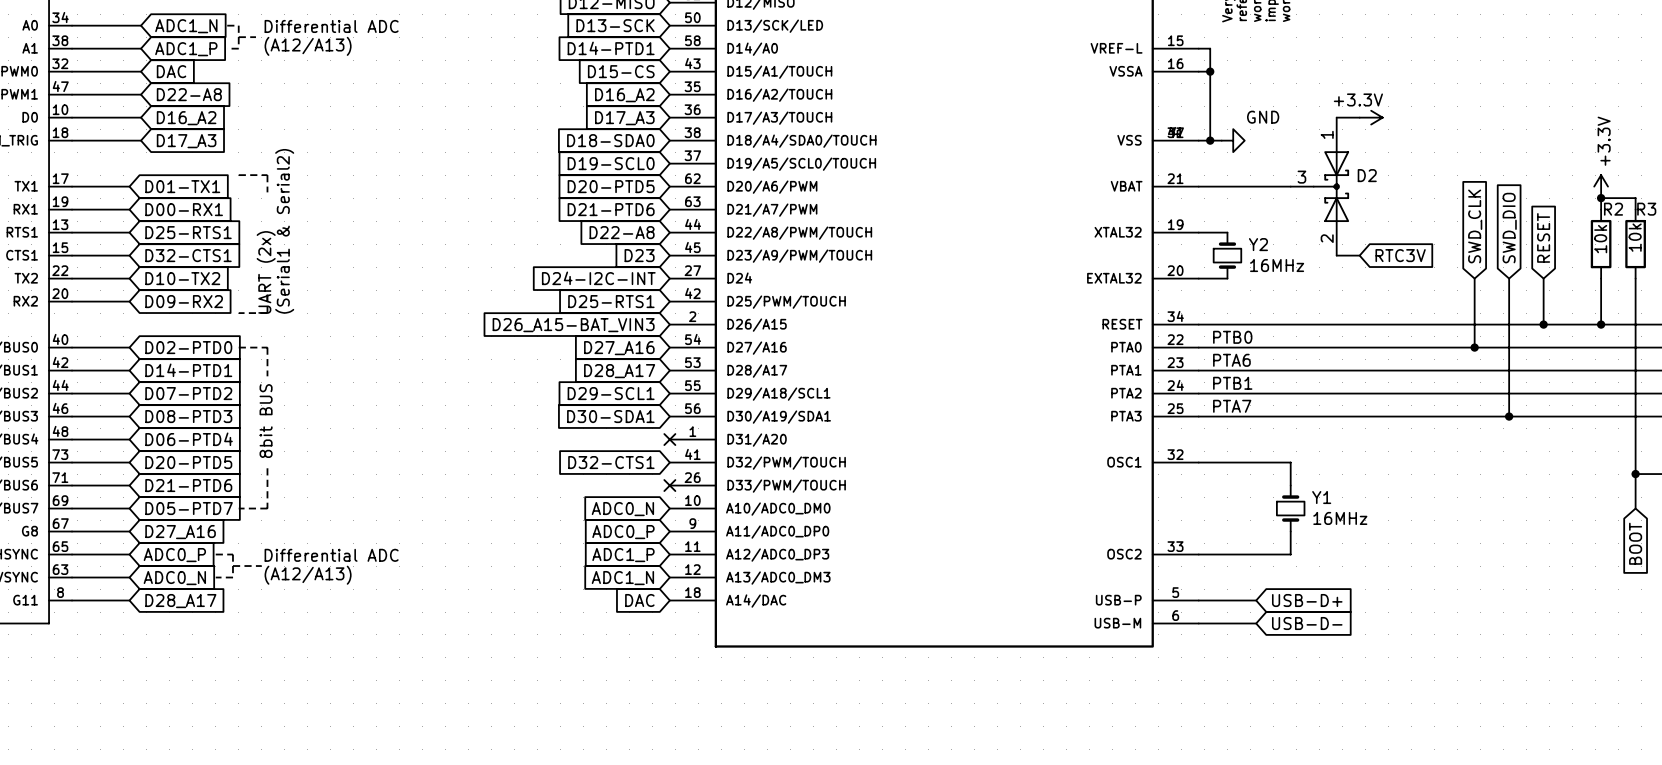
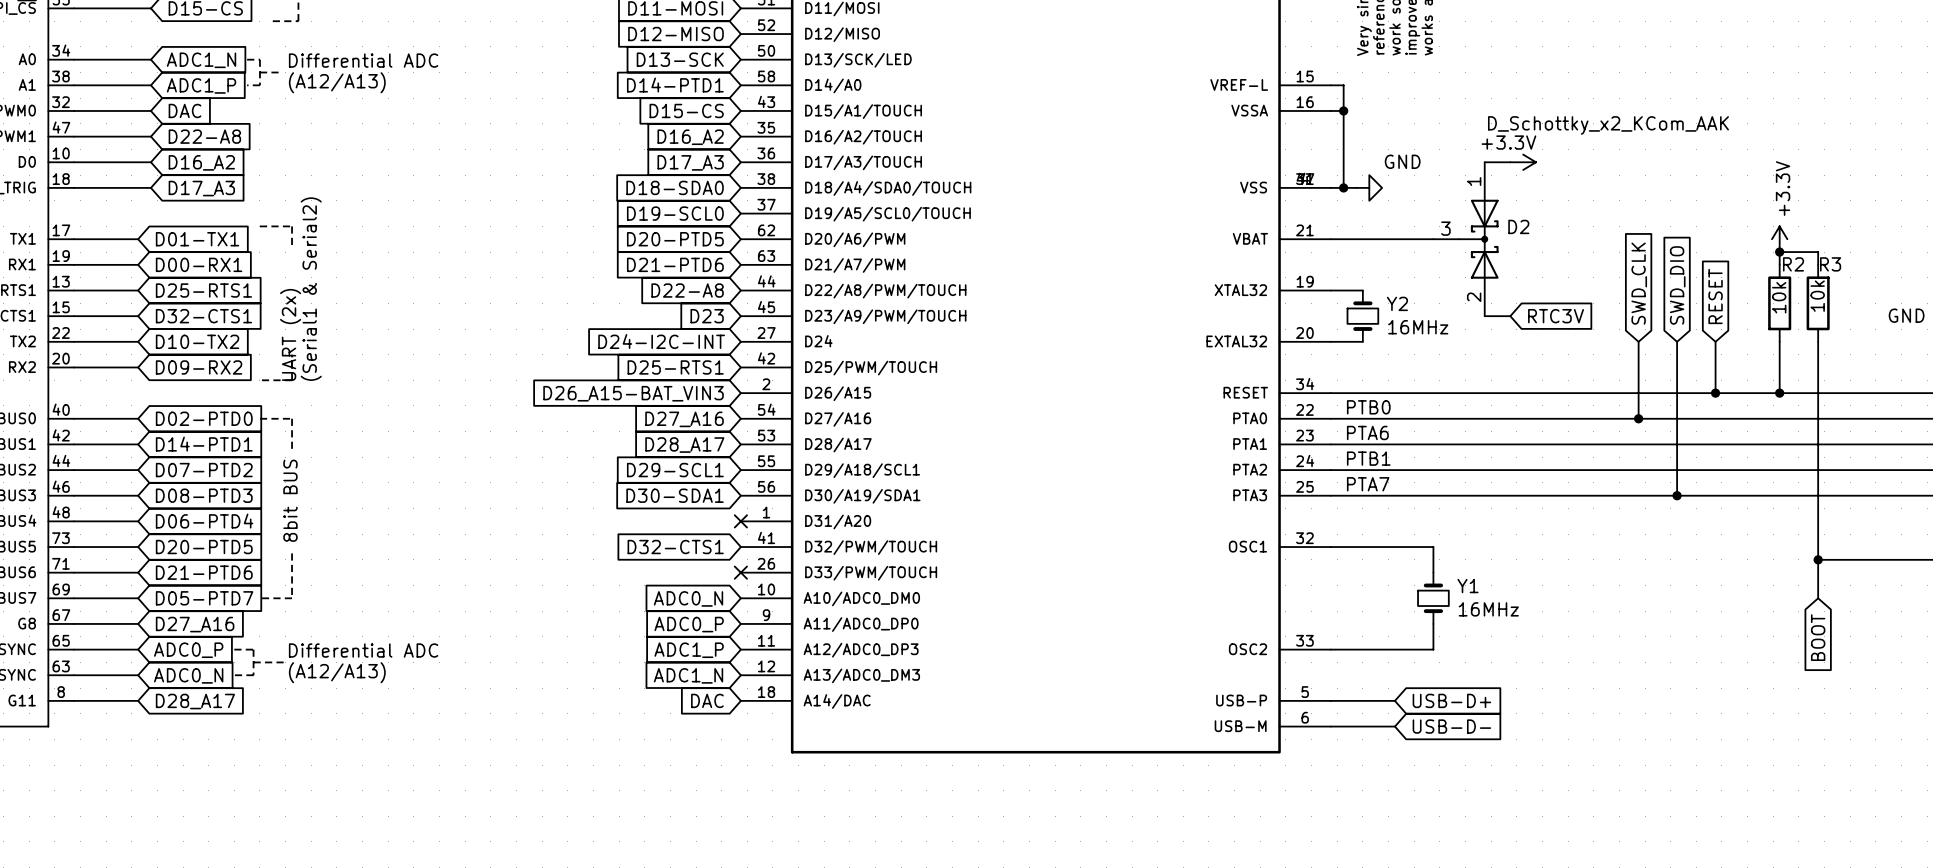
D2 value: none -> D_Schottky_x2_KCom_AAK (1608, 125)

